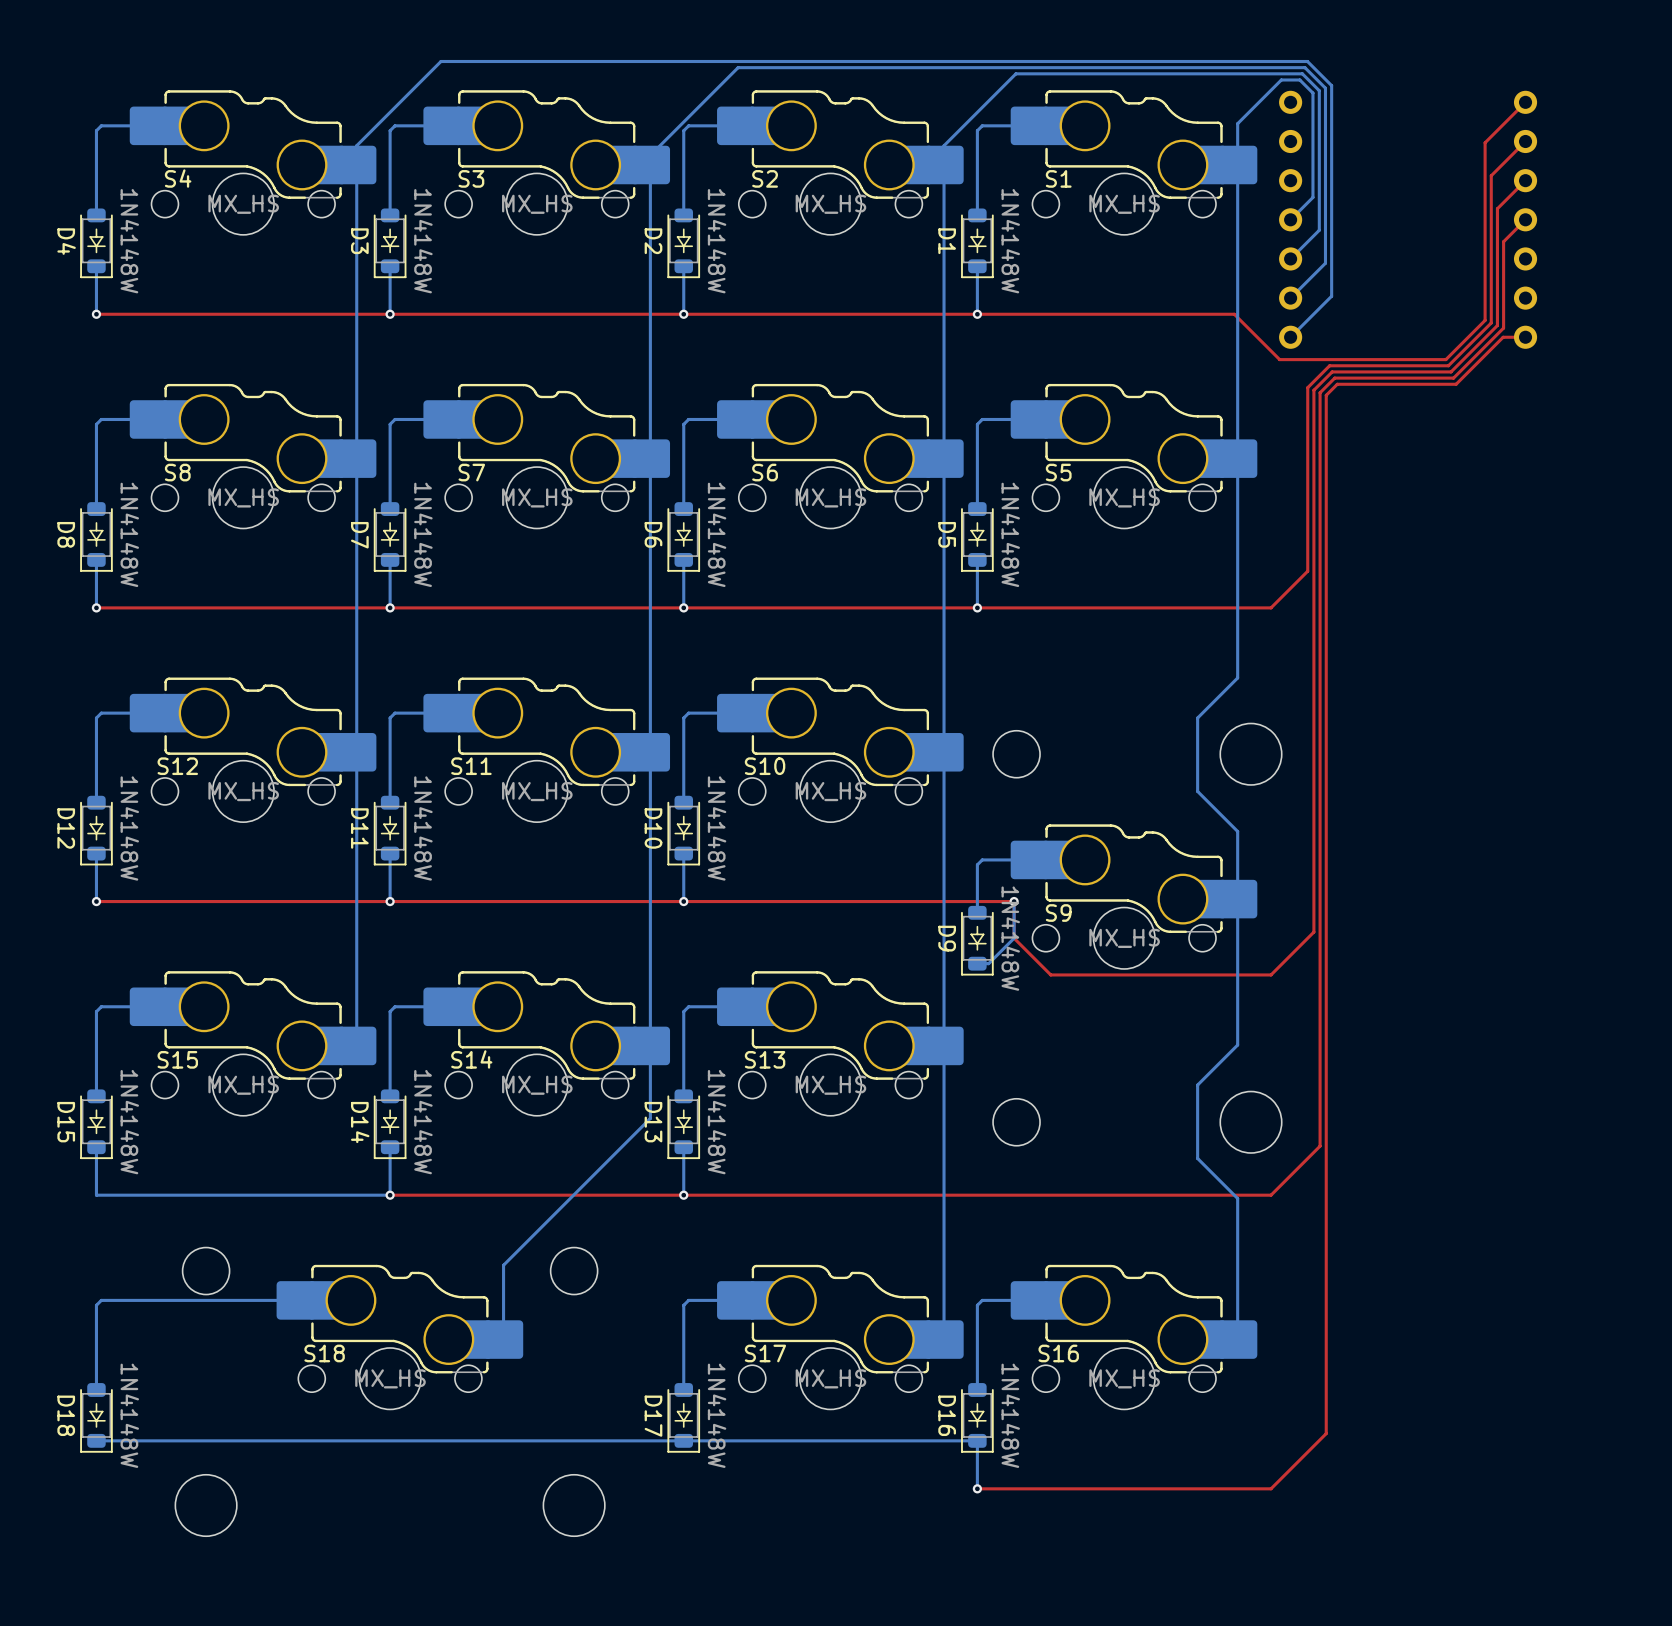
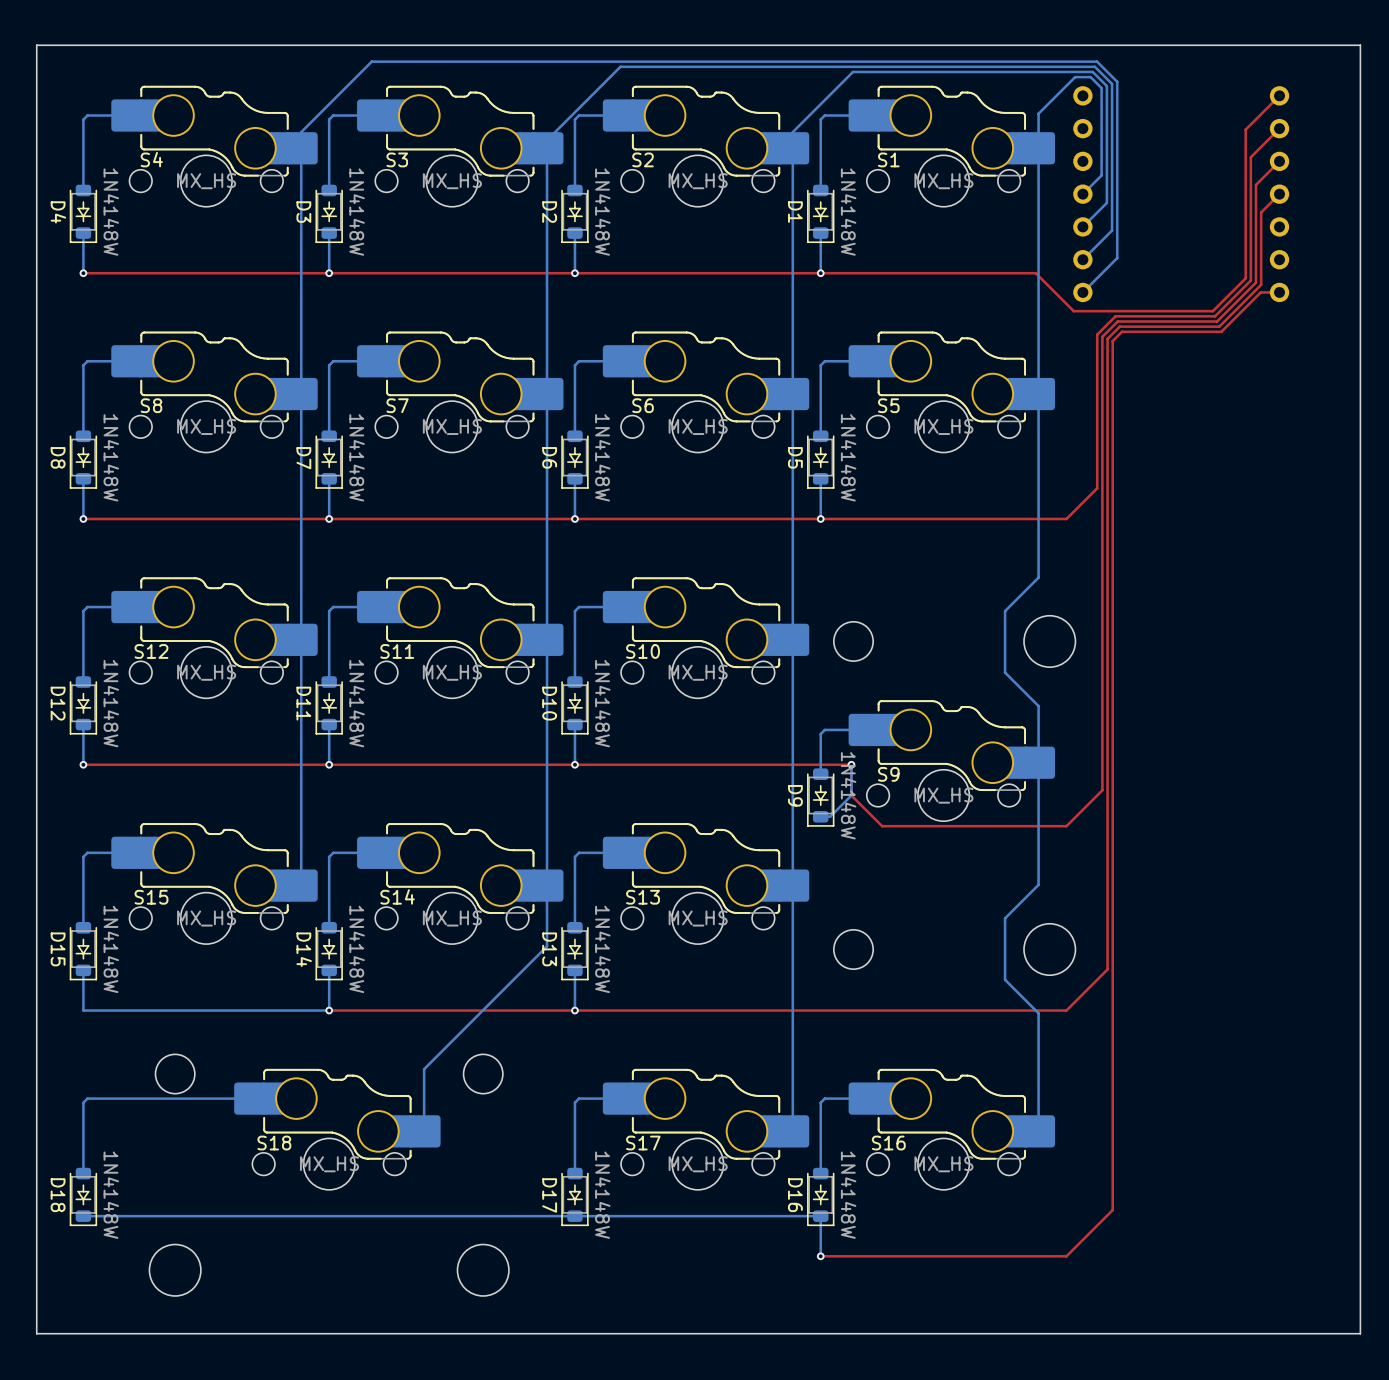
board edge: none -> (1360, 45) (36, 45) (36, 1333) (1360, 1333) (1360, 45)

